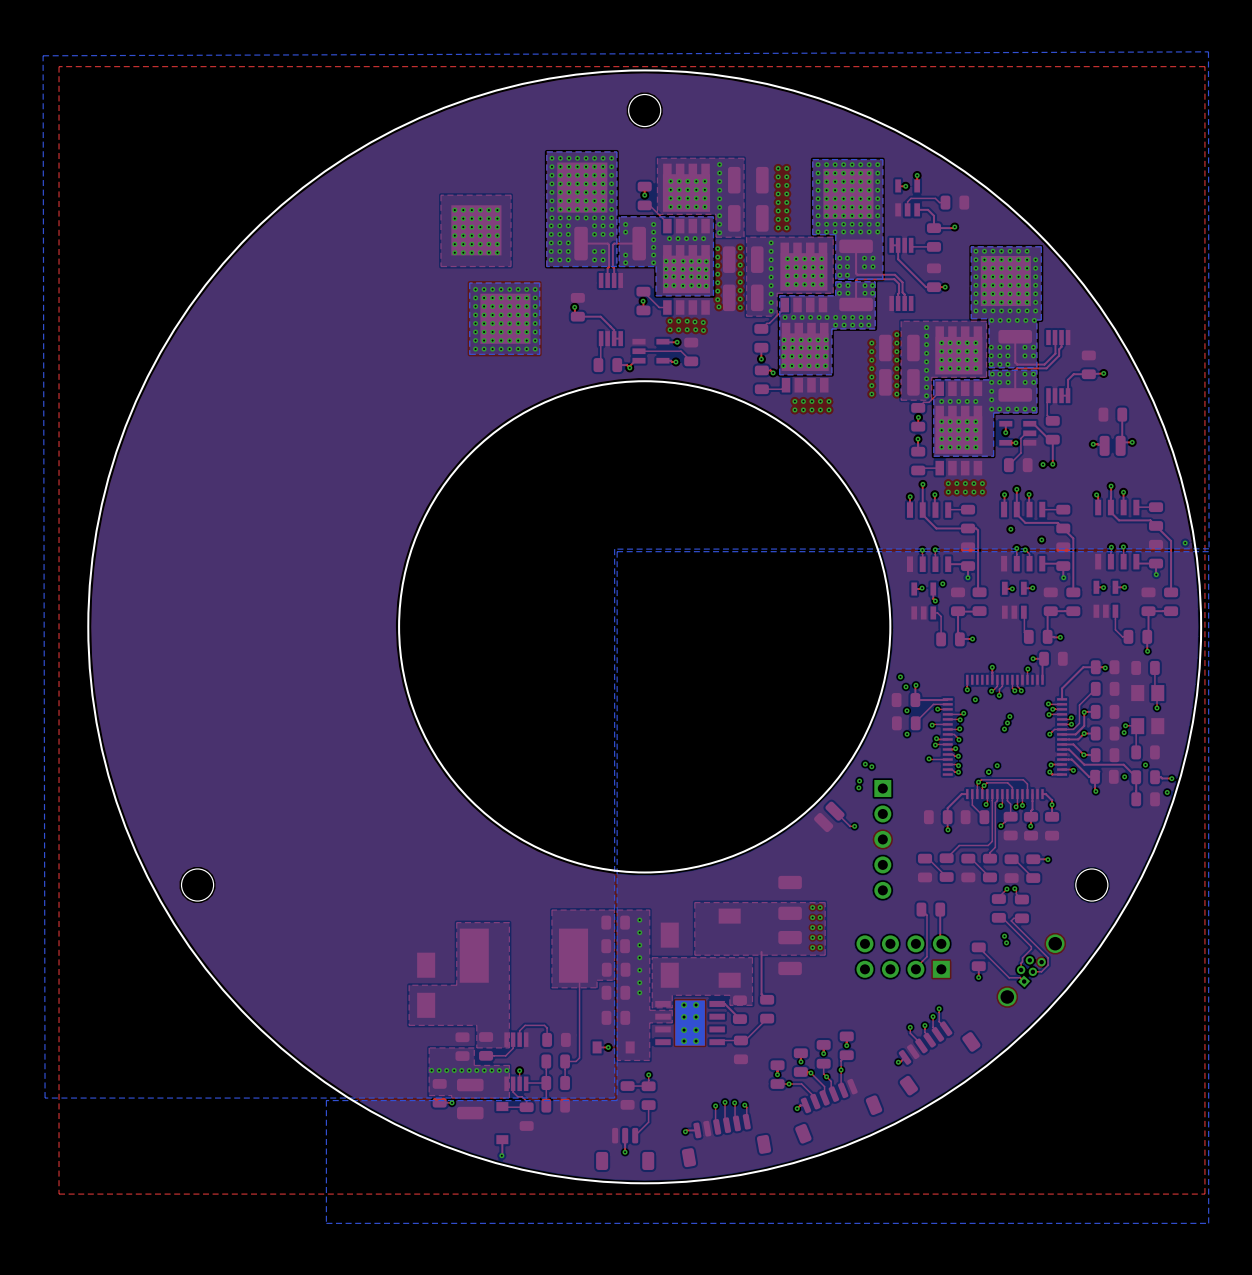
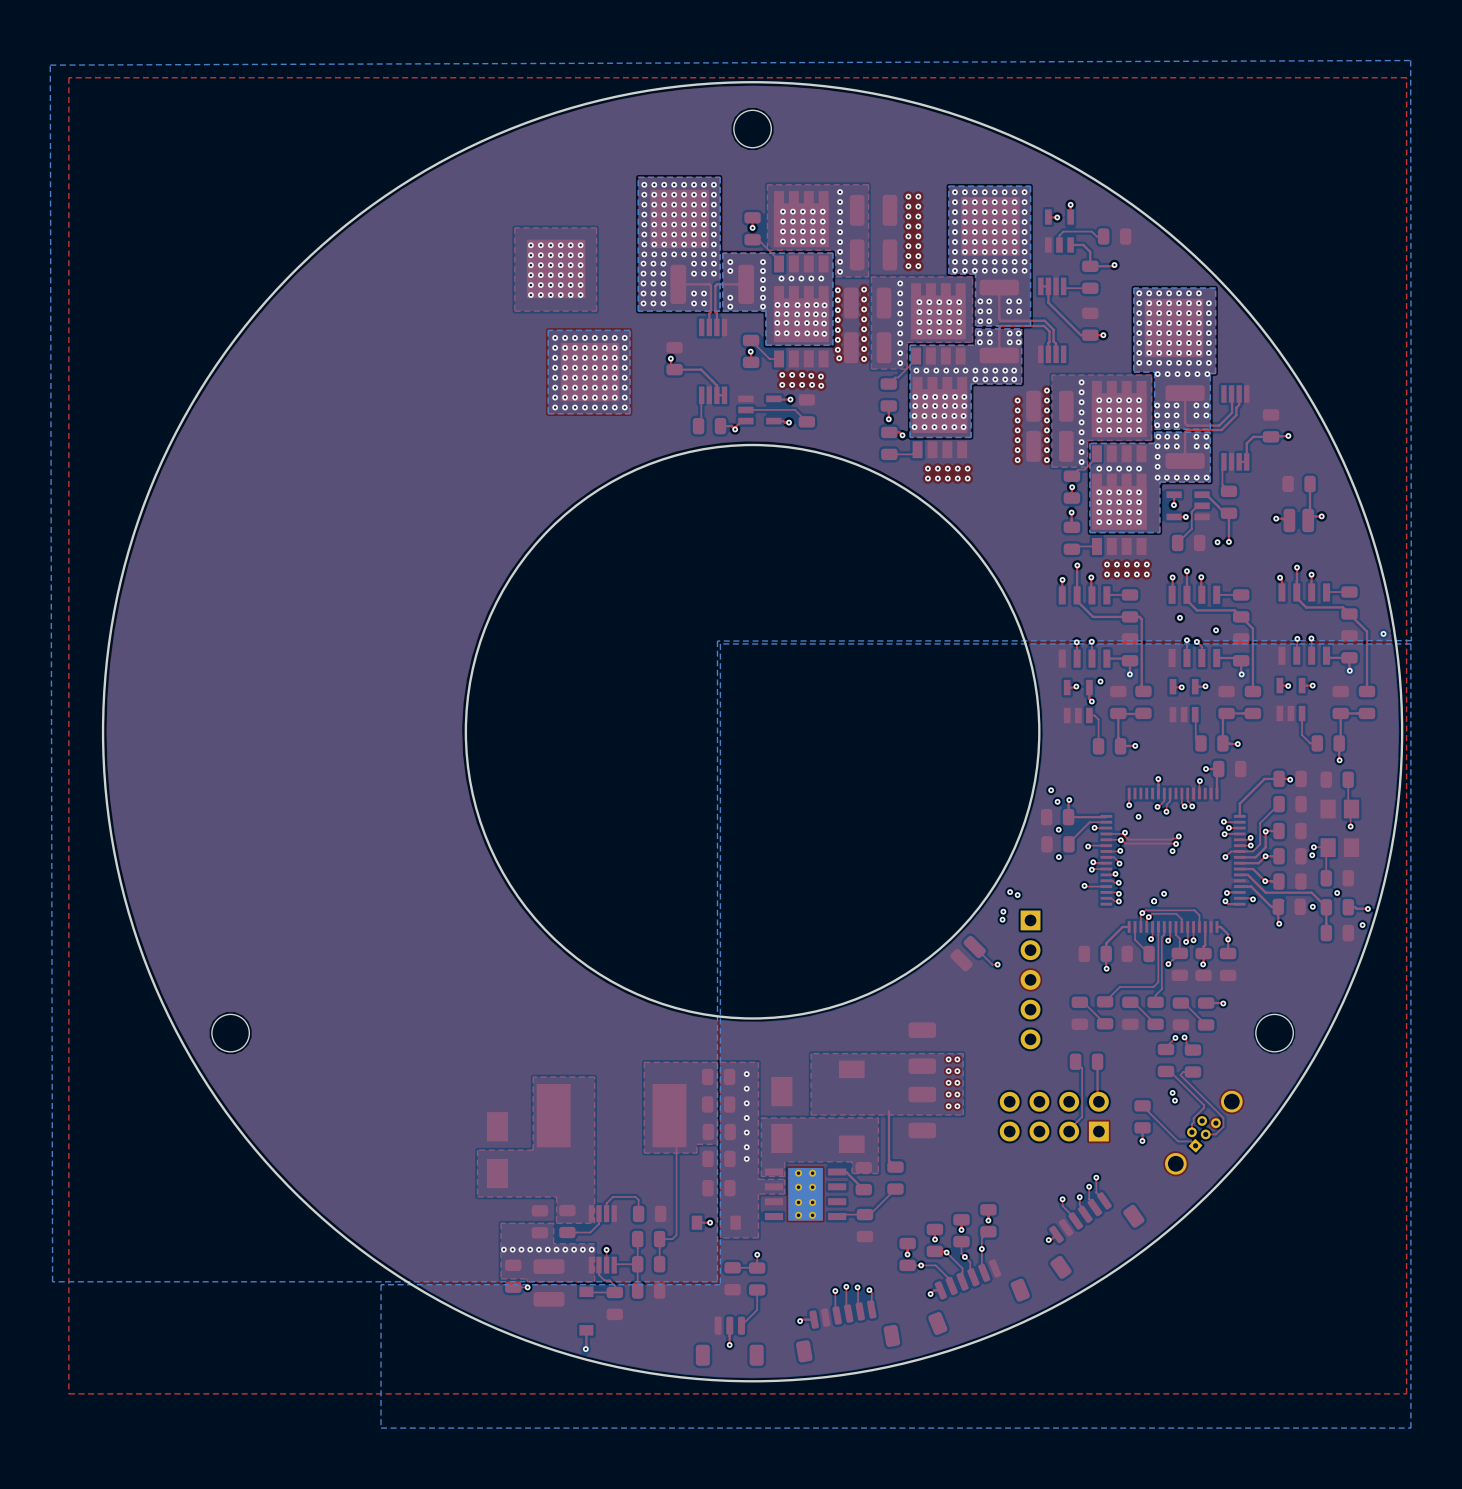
top track: none -> (1124, 832) (1124, 836) (1128, 839) (1172, 839) (1178, 836)
top track: none -> (1120, 840) (1125, 843) (1176, 843)

